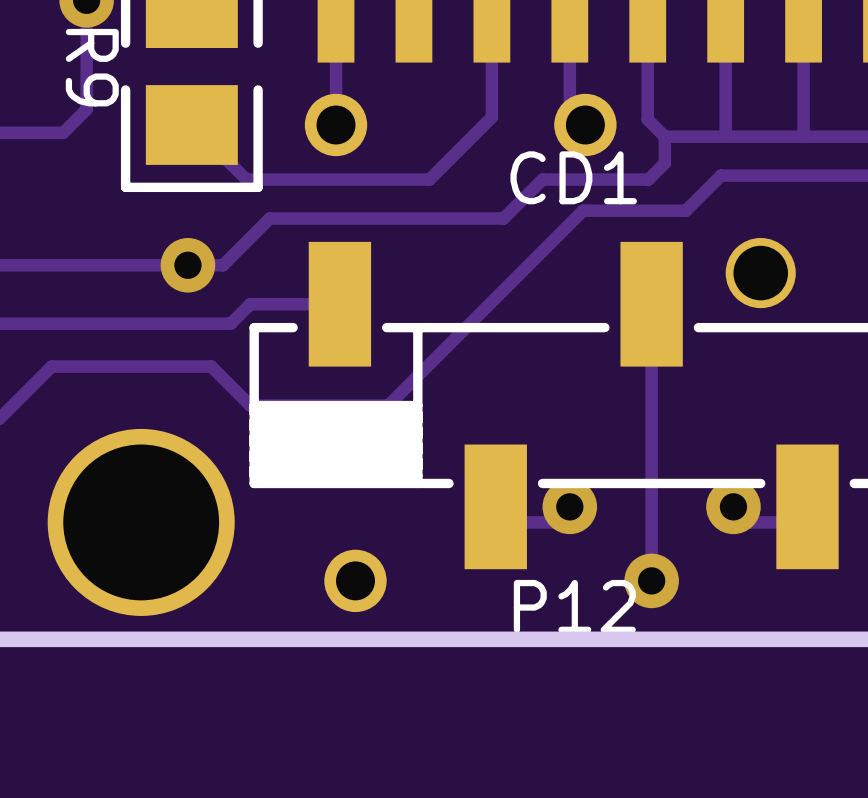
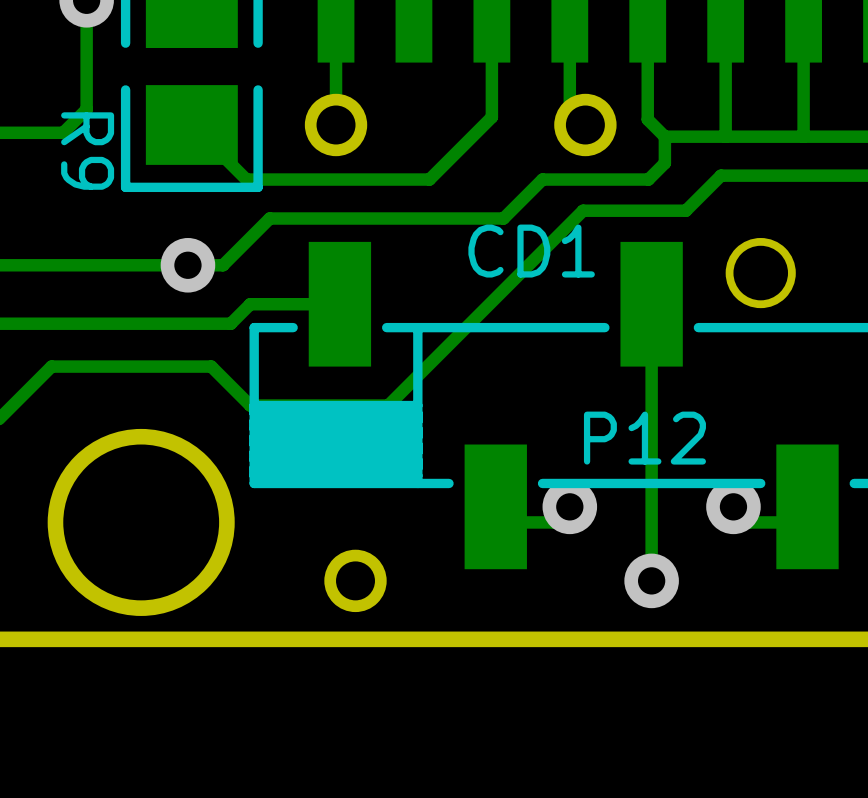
R9 name position: R9 (92, 67) -> R9 (87, 151)
P12 value position: CD1 (573, 177) -> CD1 (531, 251)
P12 name position: P12 (574, 606) -> P12 (644, 438)

